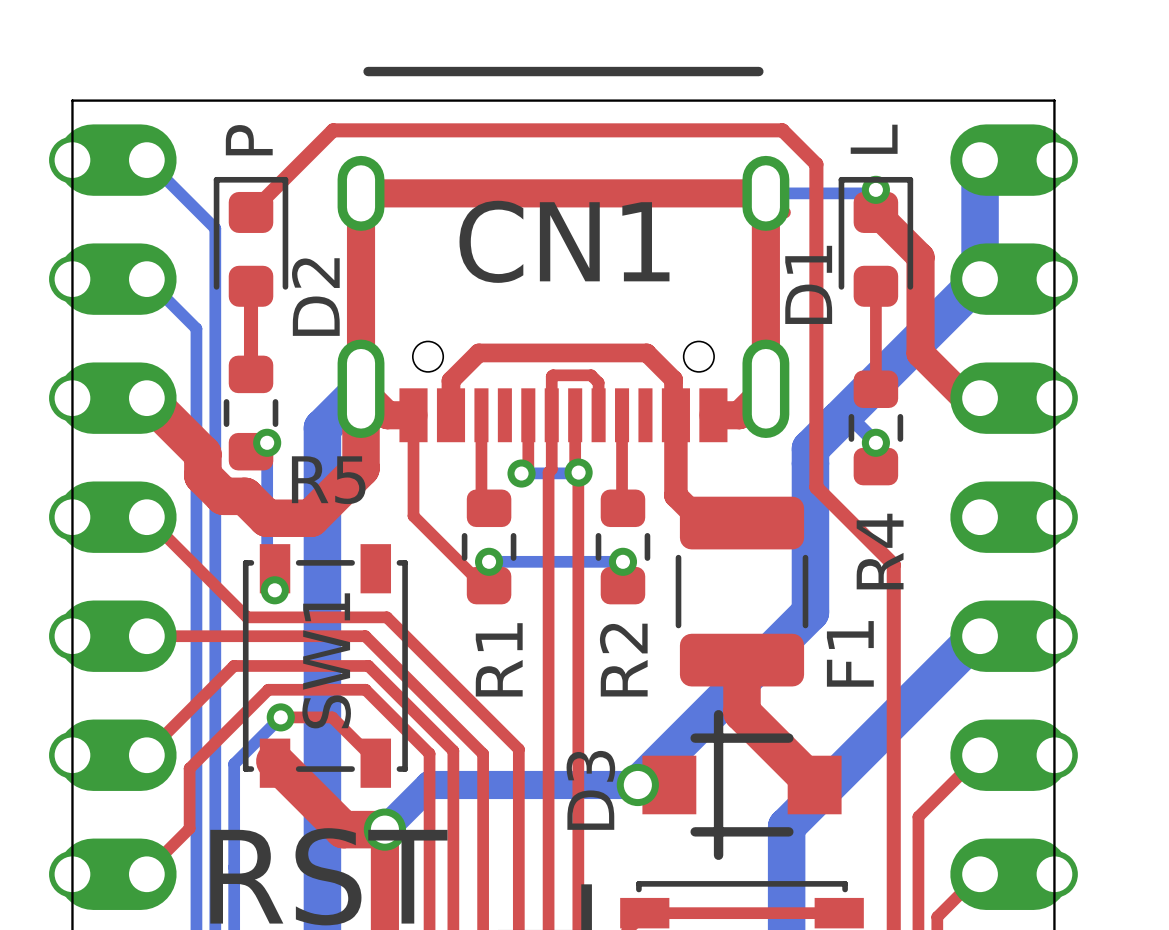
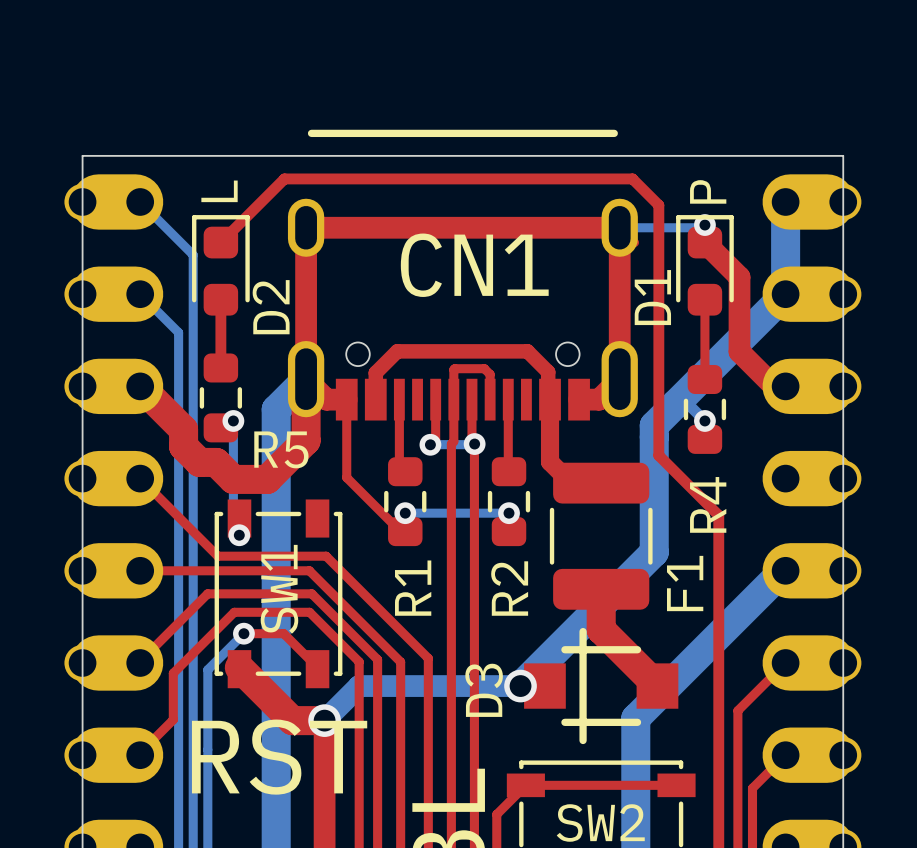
text: L (874, 139) -> P (708, 191)
text: P (249, 140) -> L (219, 191)

